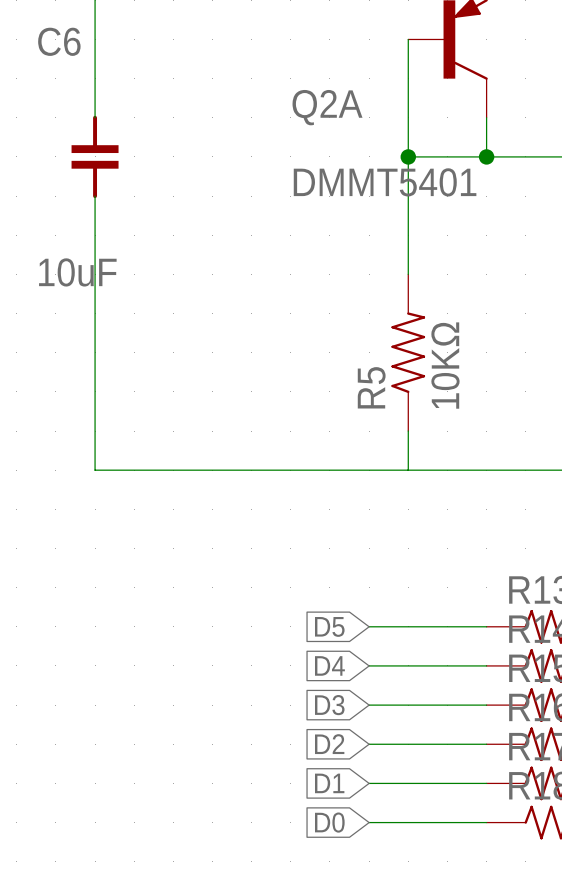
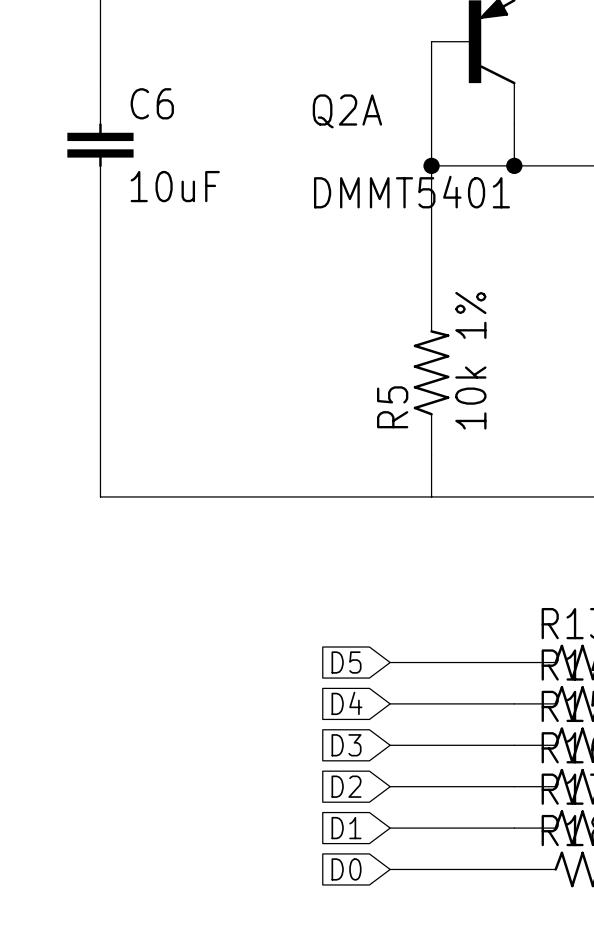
C6 name position: C6 (59, 41) -> C6 (152, 103)
C6 symbol: [71, 115, 119, 199] -> [67, 83, 134, 208]
C6 value position: 10uF (77, 272) -> 10uF (175, 186)
R5 value: 10KΩ (445, 365) -> 10k 1% (470, 360)

